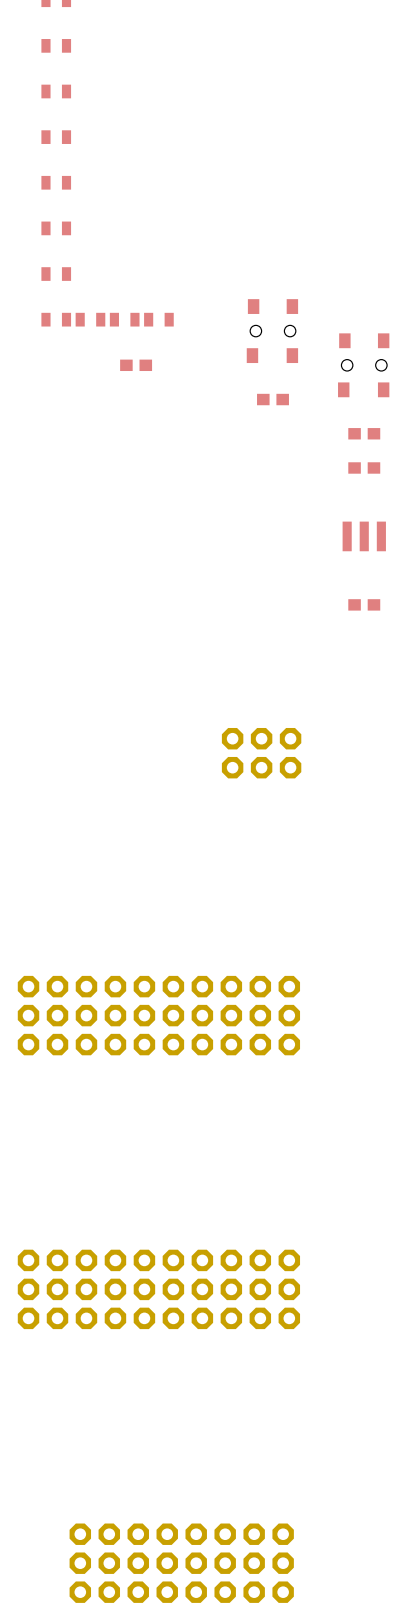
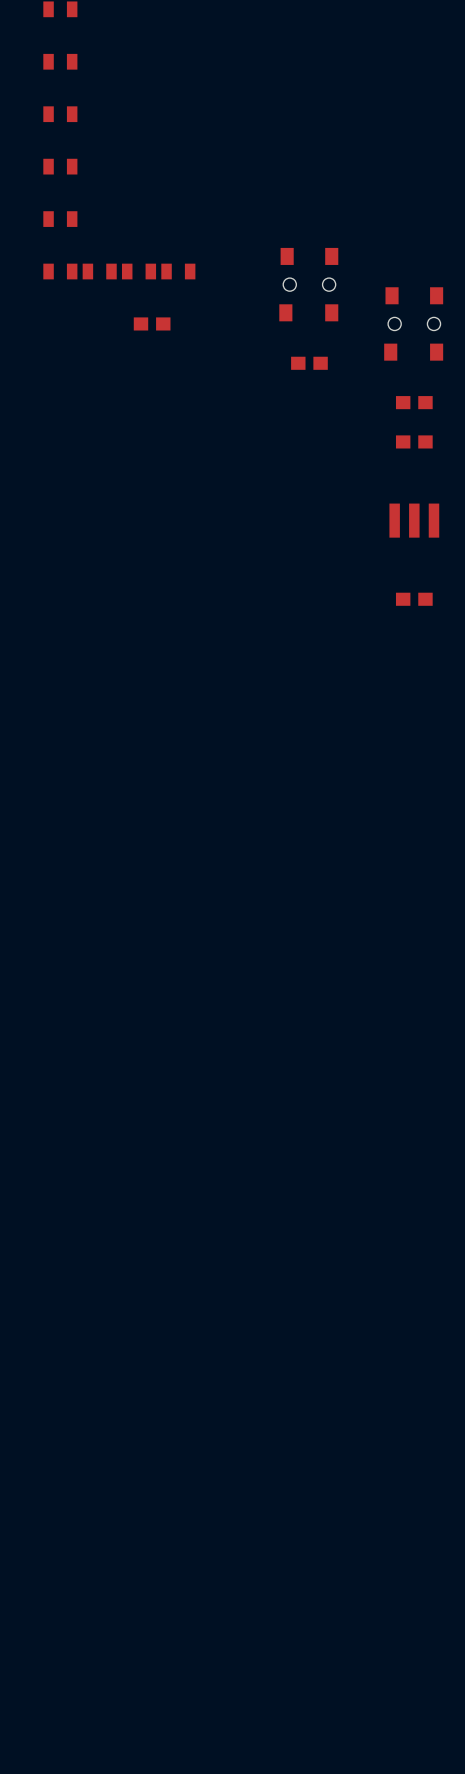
part: (261, 753) -> none
part: (158, 1015) -> none
part: (158, 1289) -> none
part: (181, 1563) -> none

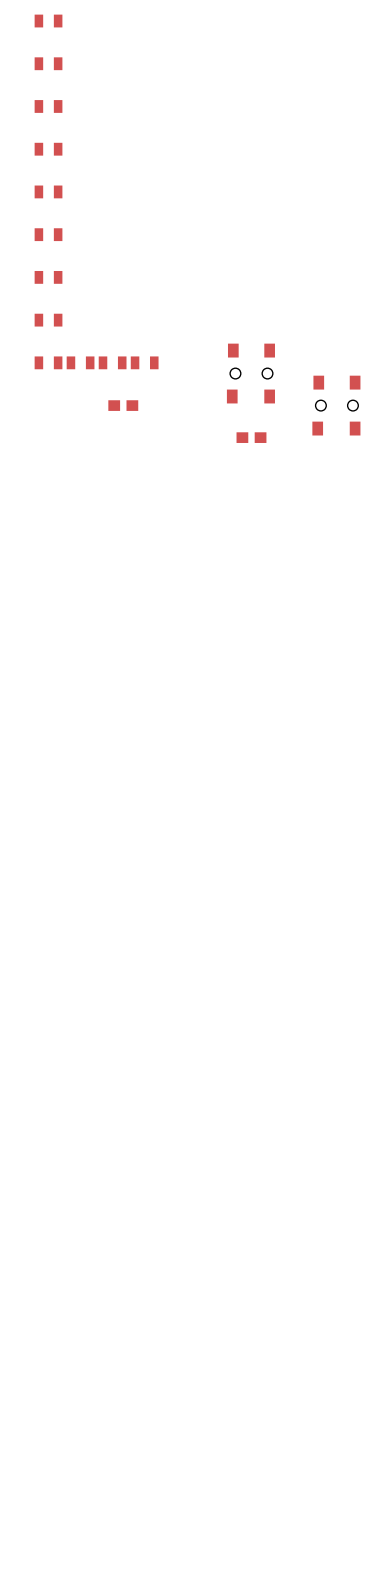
part: (414, 402) -> none
part: (414, 441) -> none
part: (414, 520) -> none
part: (414, 599) -> none

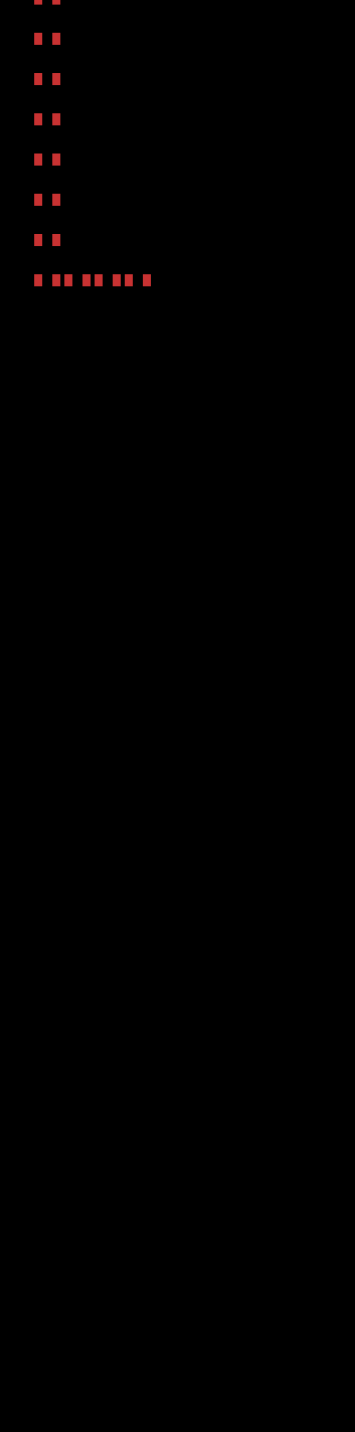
part: (250, 373) -> none
part: (123, 405) -> none
part: (336, 405) -> none
part: (251, 437) -> none

